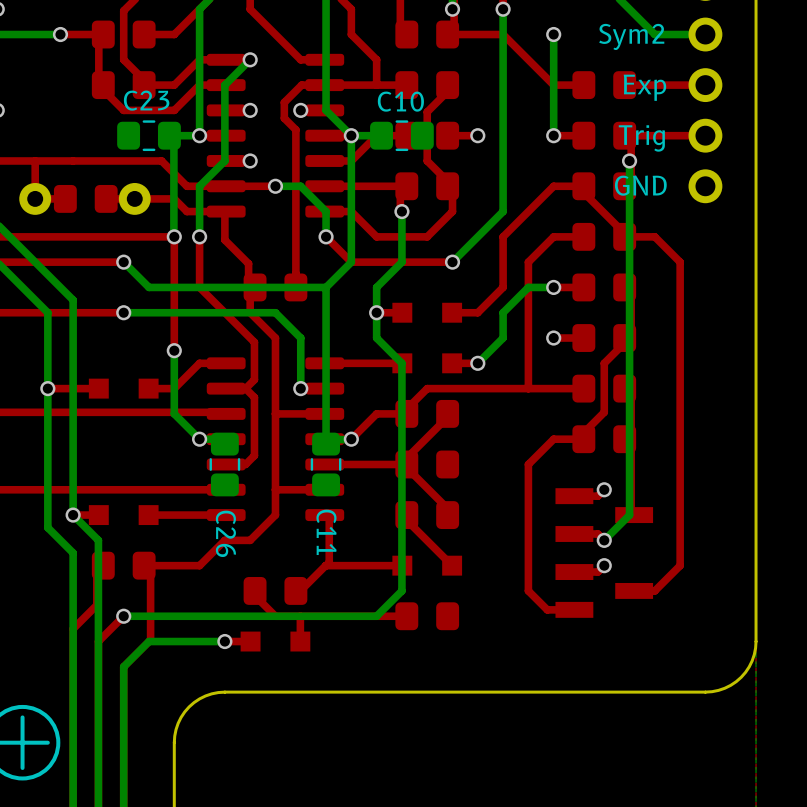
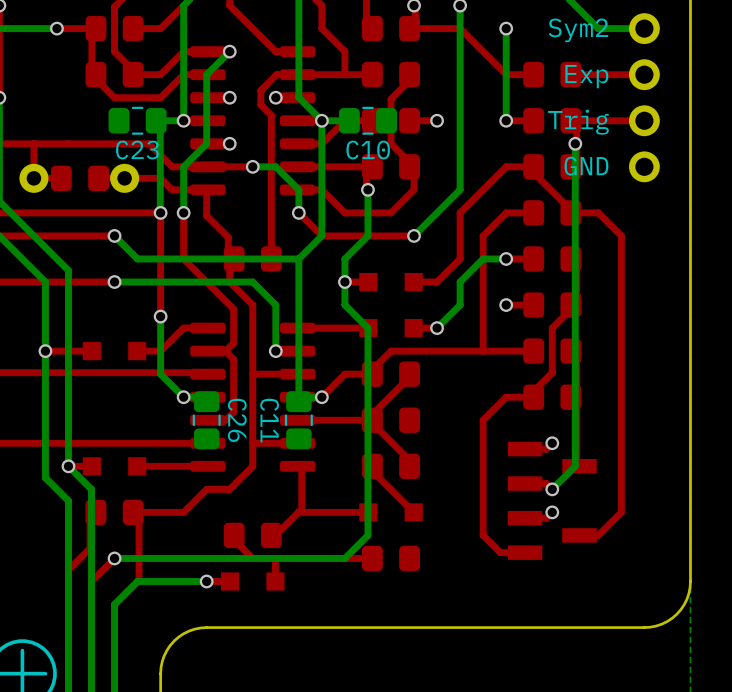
C23 name position: C23 (146, 100) -> C23 (137, 150)
C10 name position: C10 (400, 101) -> C10 (368, 150)
C11 name position: C11 (326, 532) -> C11 (269, 420)
C26 name position: C26 (225, 533) -> C26 (237, 420)

